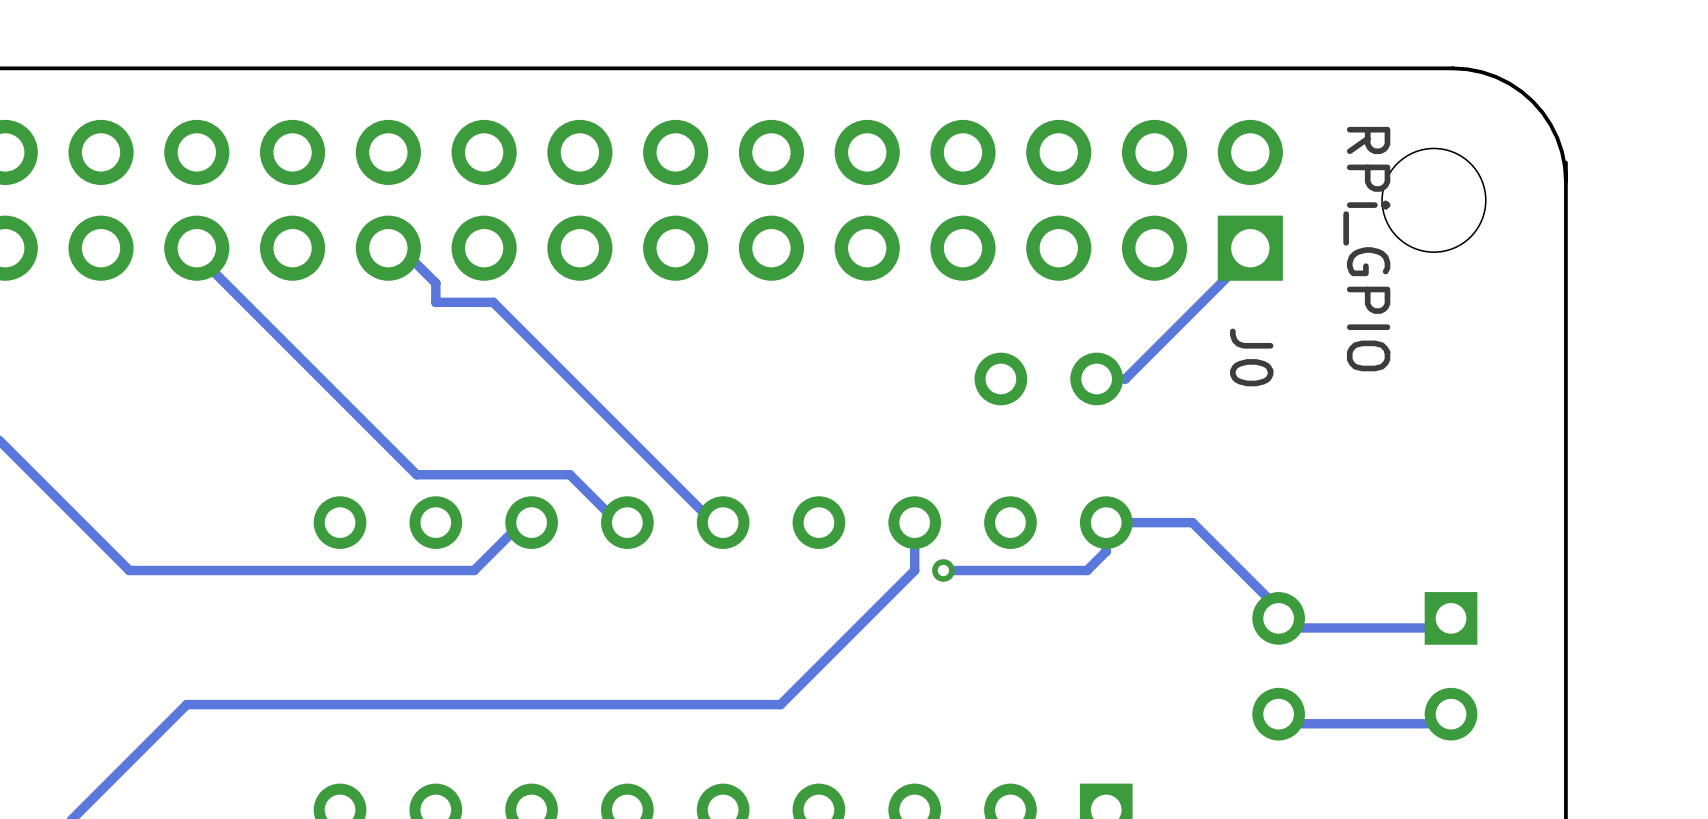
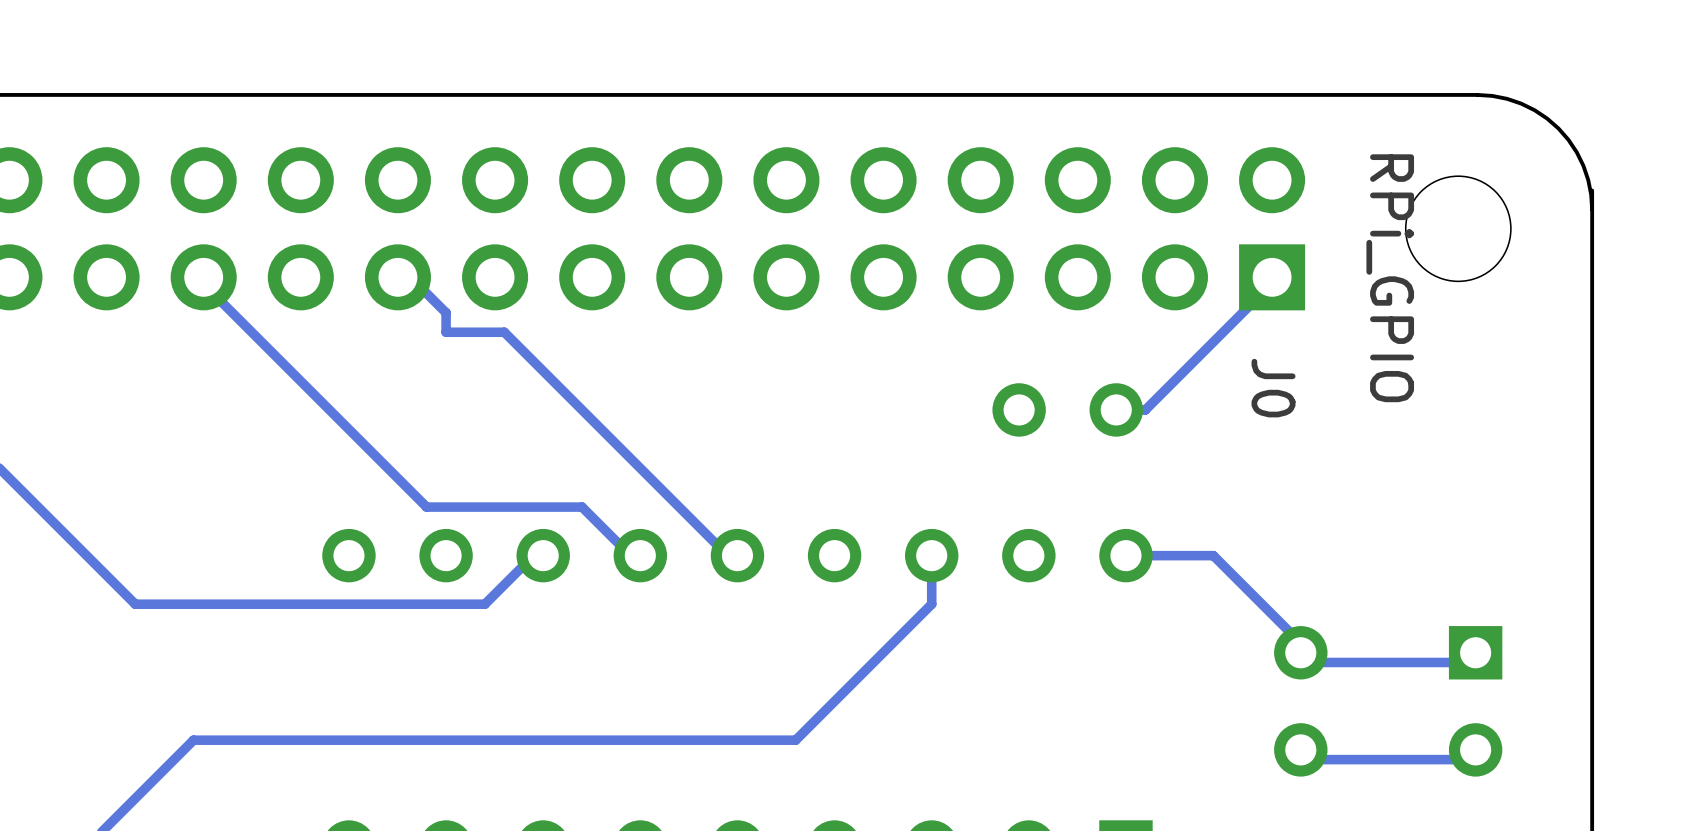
track: (1106, 532) (1106, 551) (1087, 570) (943, 570) -> none
via: (943, 570) -> none

